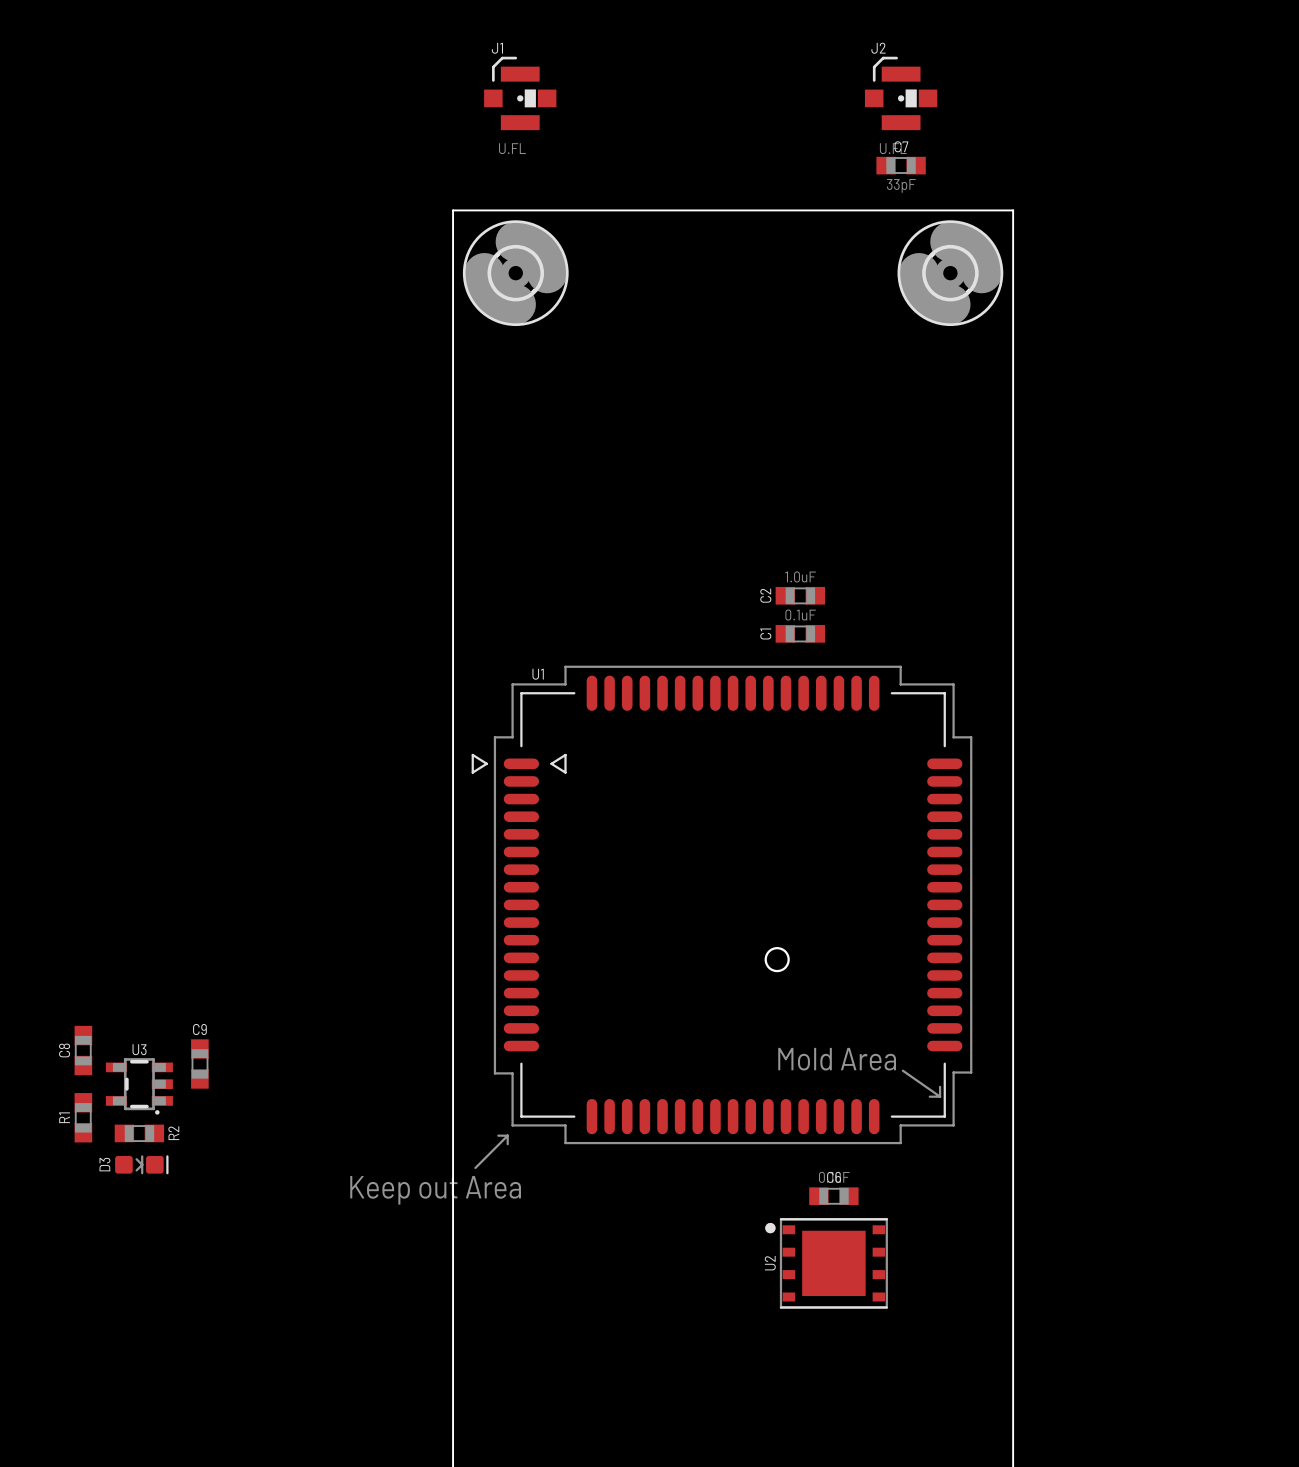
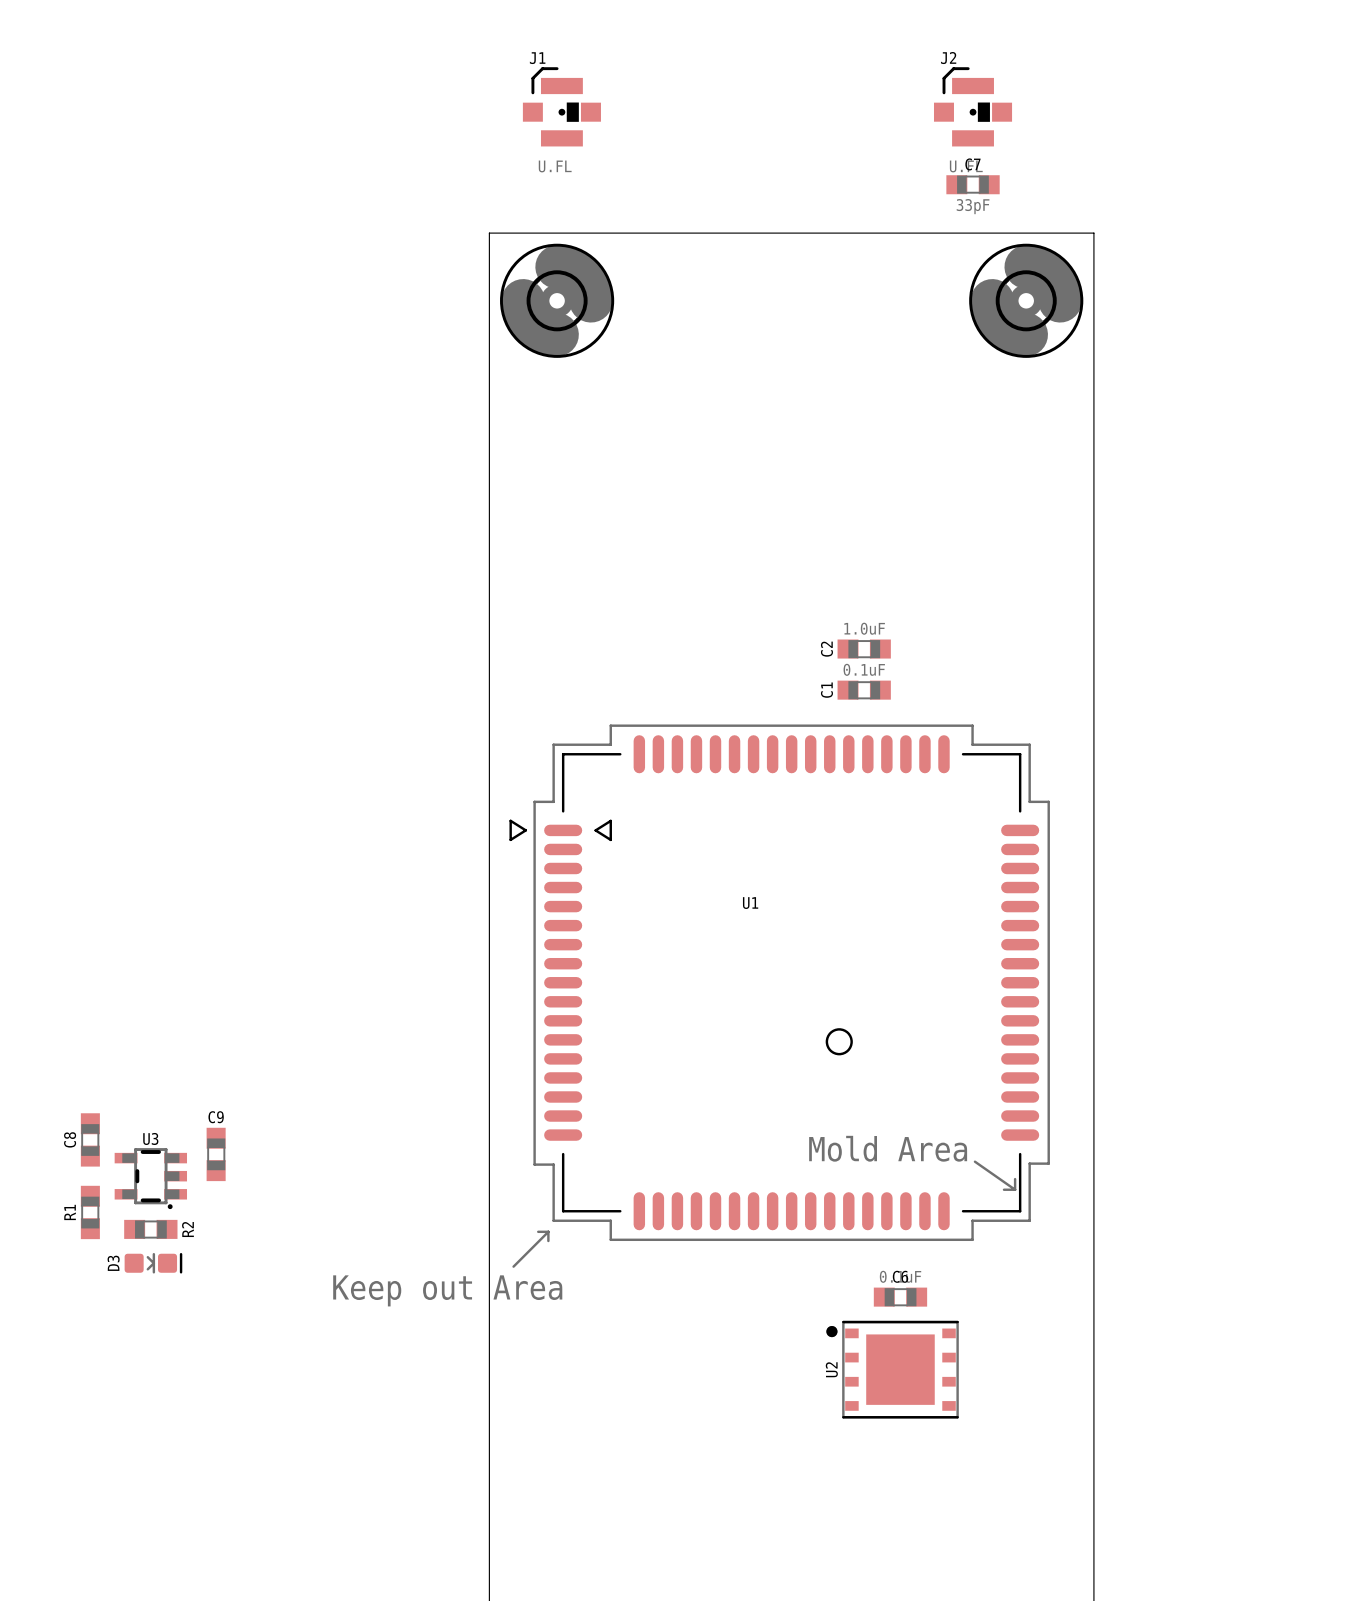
U1 name position: U1 (538, 674) -> U1 (750, 903)

